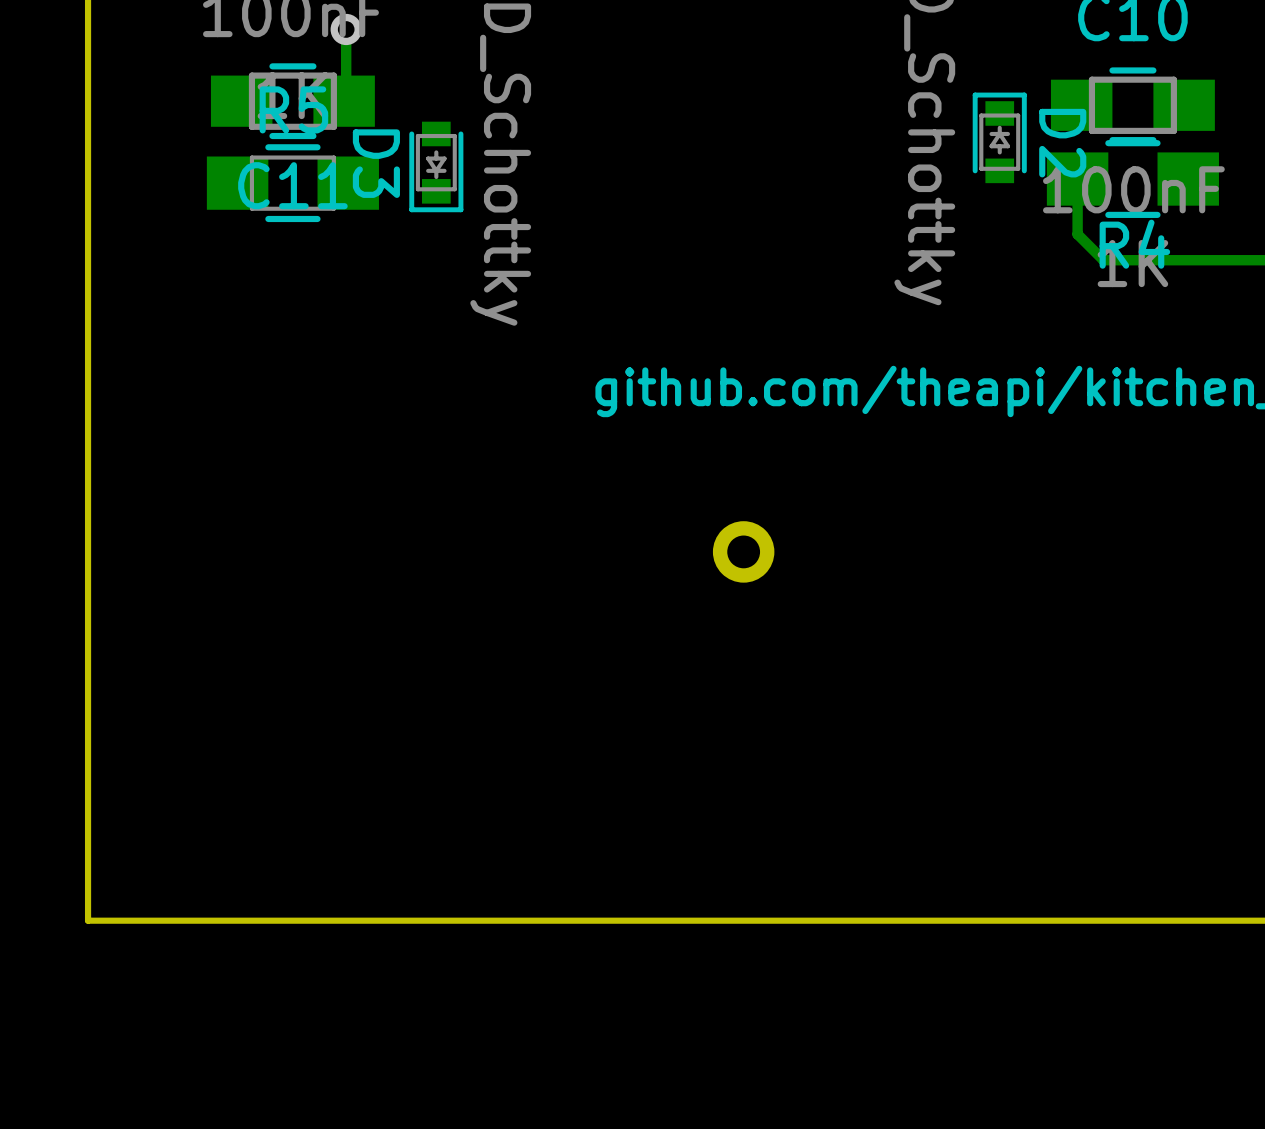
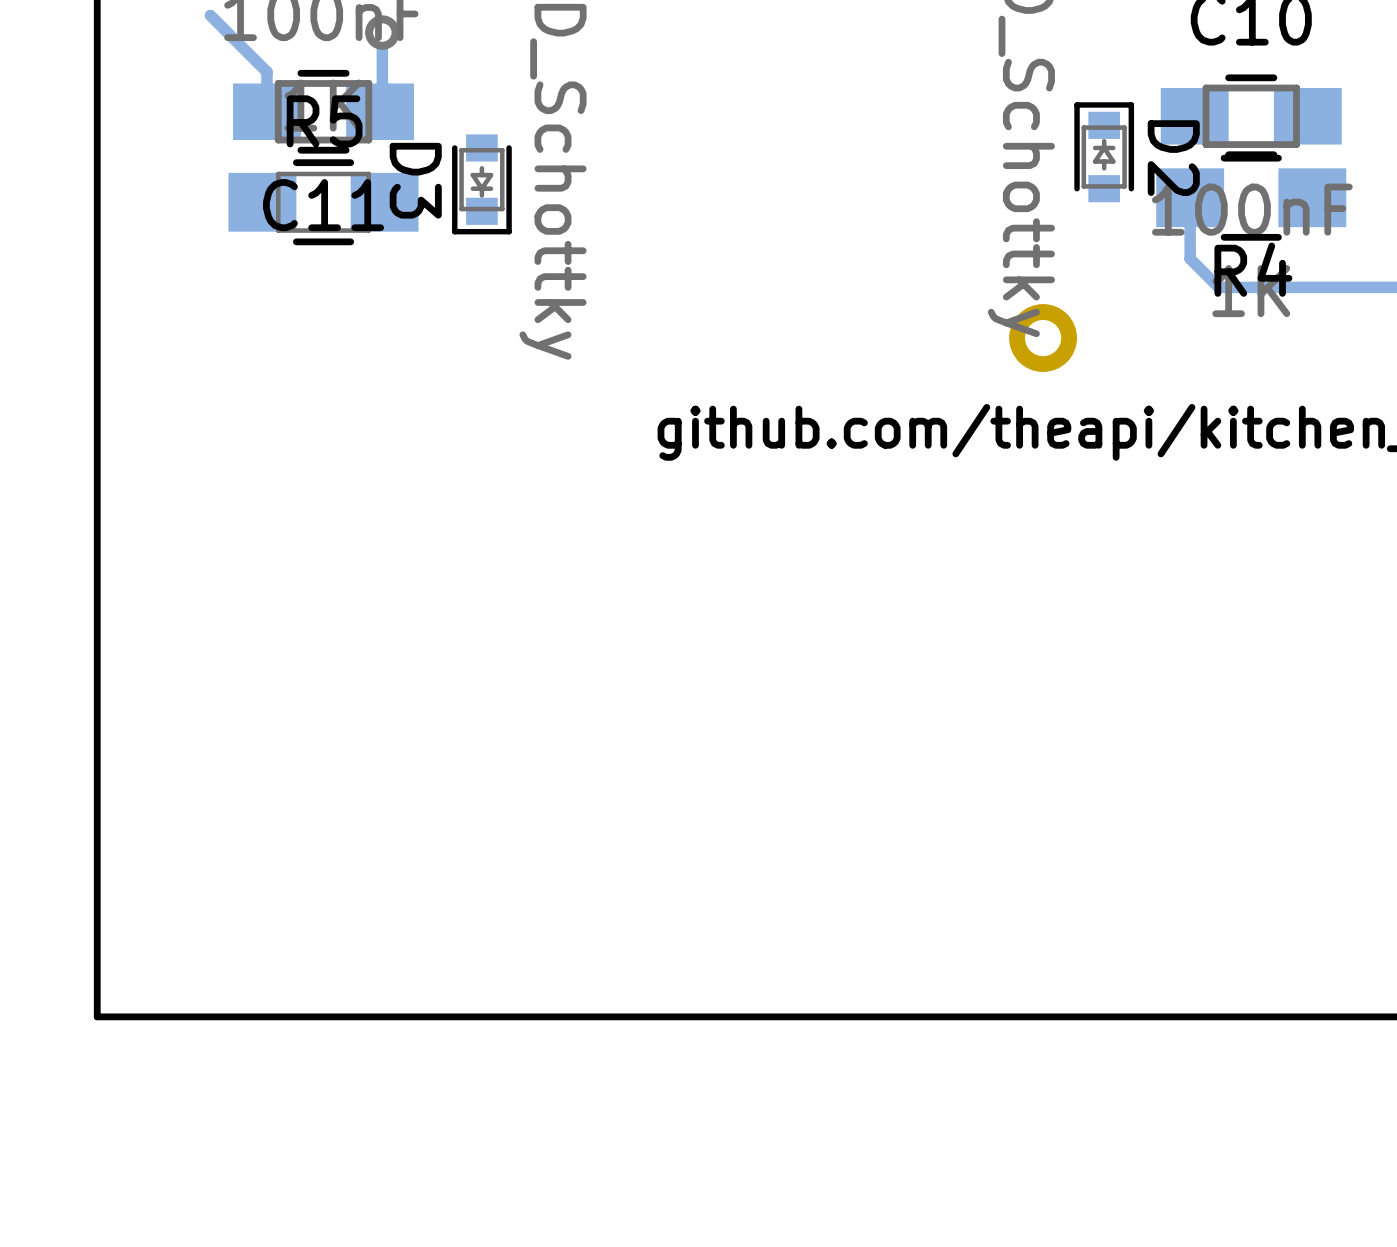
track: none -> (210, 15) (266, 71) (266, 111)
part position: (743, 551) -> (1043, 338)

